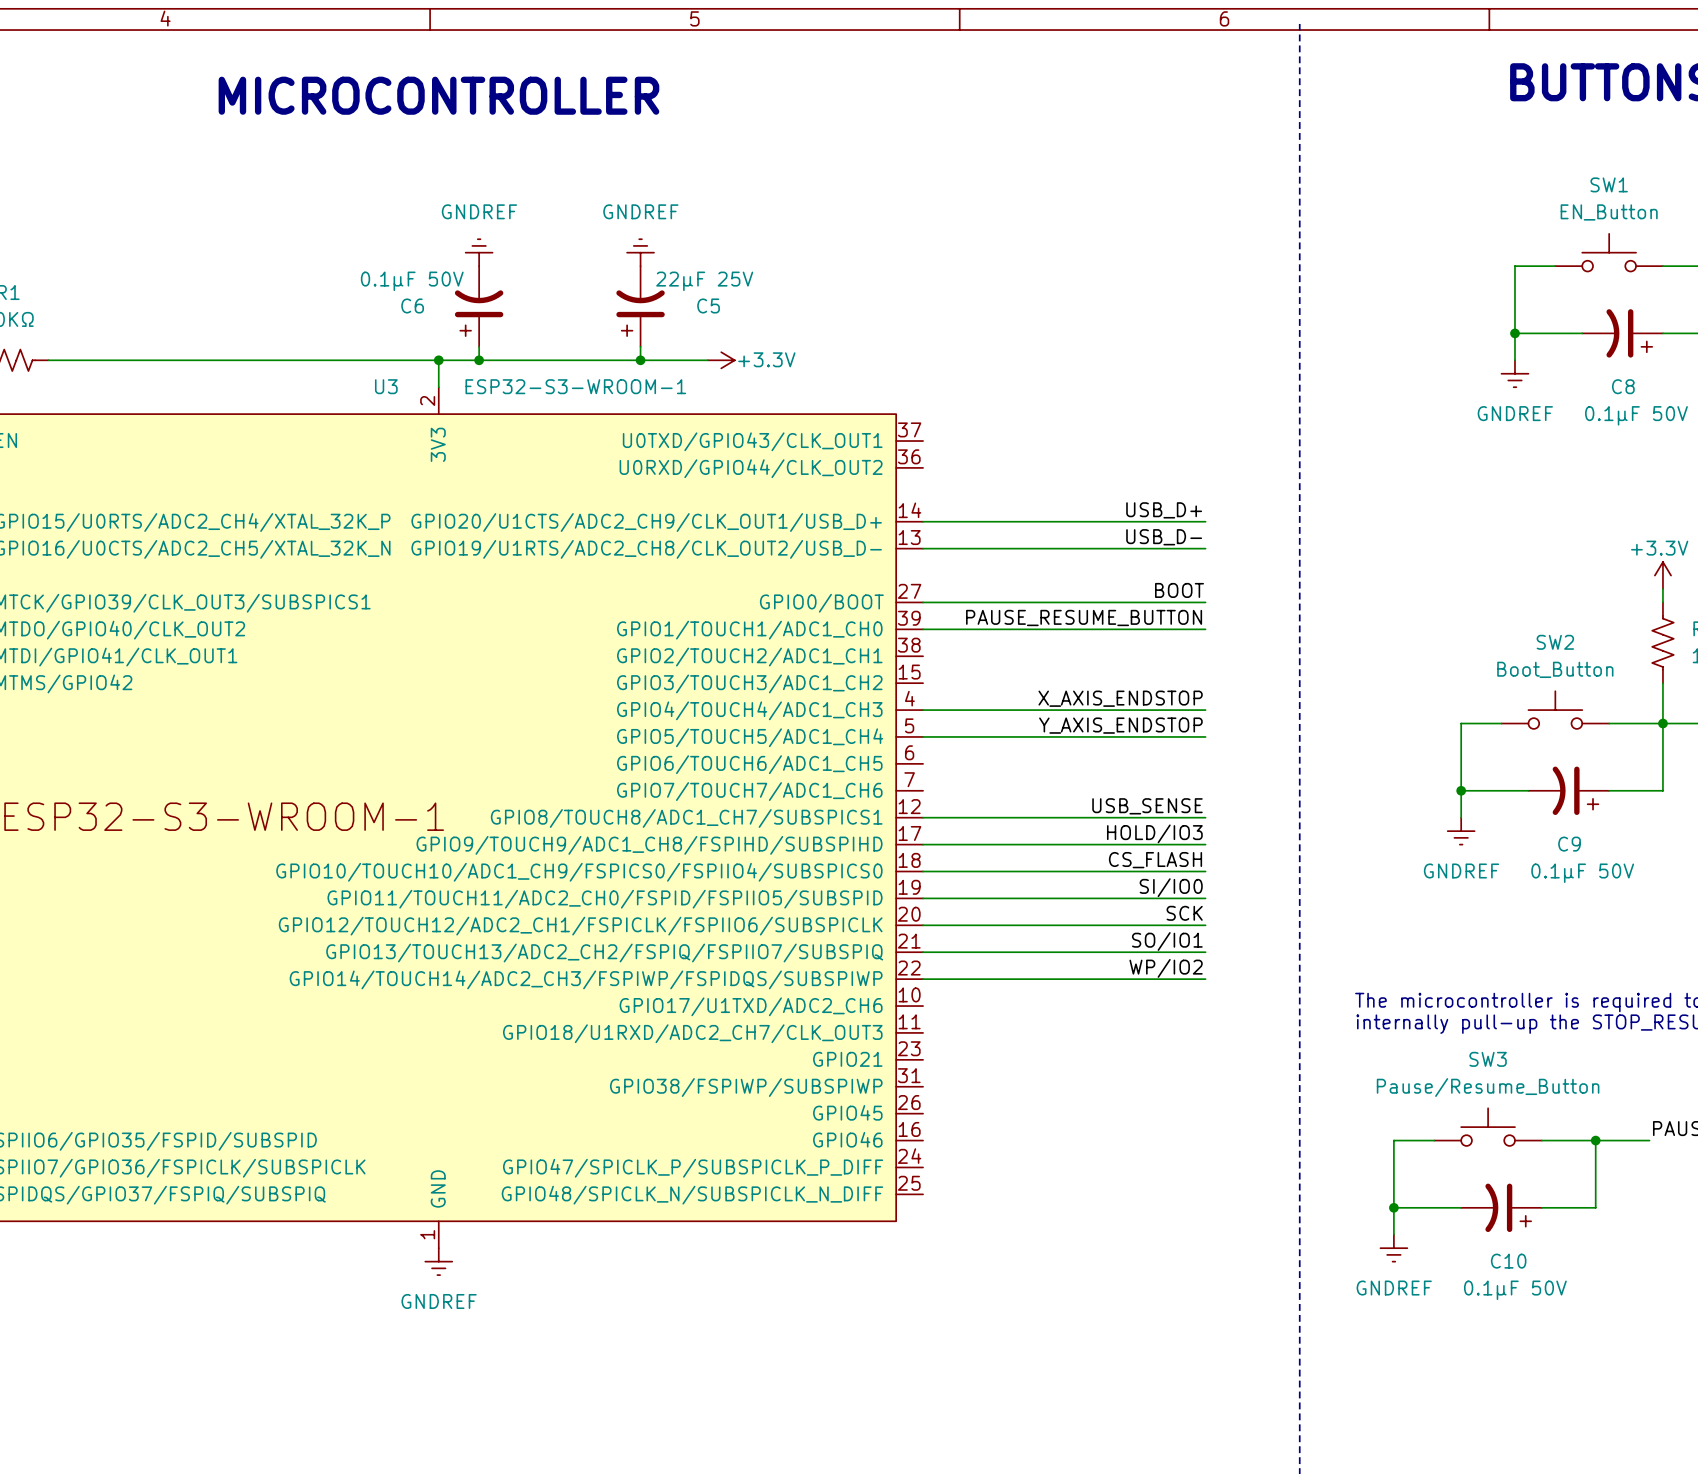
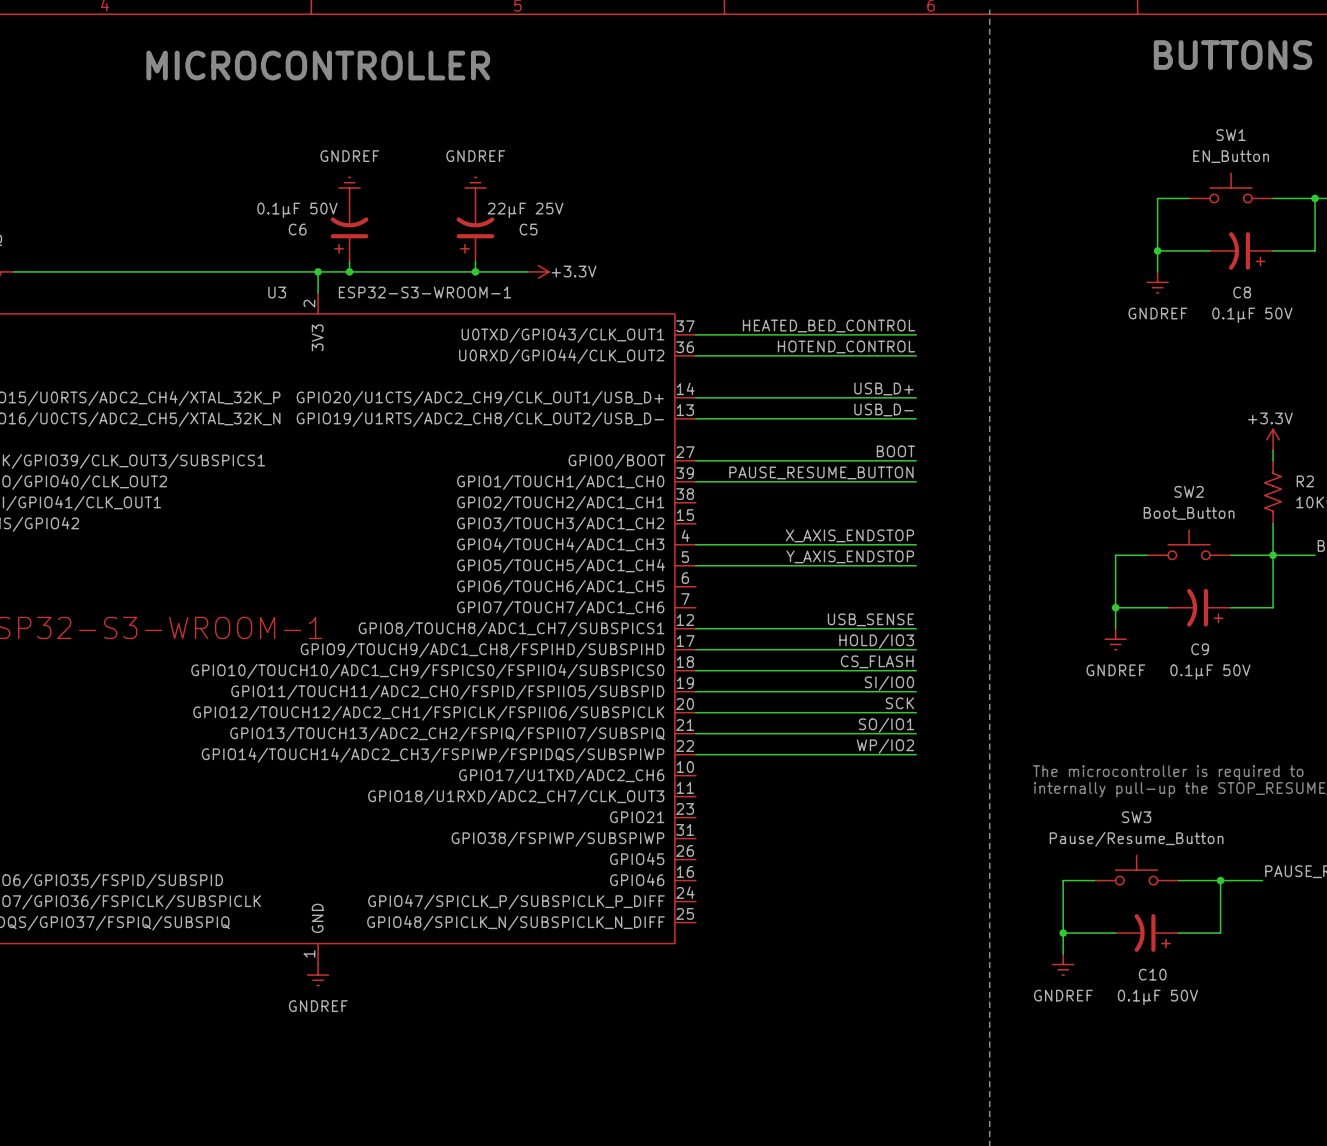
label: none -> HEATED_BED_CONTROL (828, 326)
wire: none -> (695, 334) (916, 334)
label: none -> HOTEND_CONTROL (846, 347)
wire: none -> (695, 355) (916, 355)

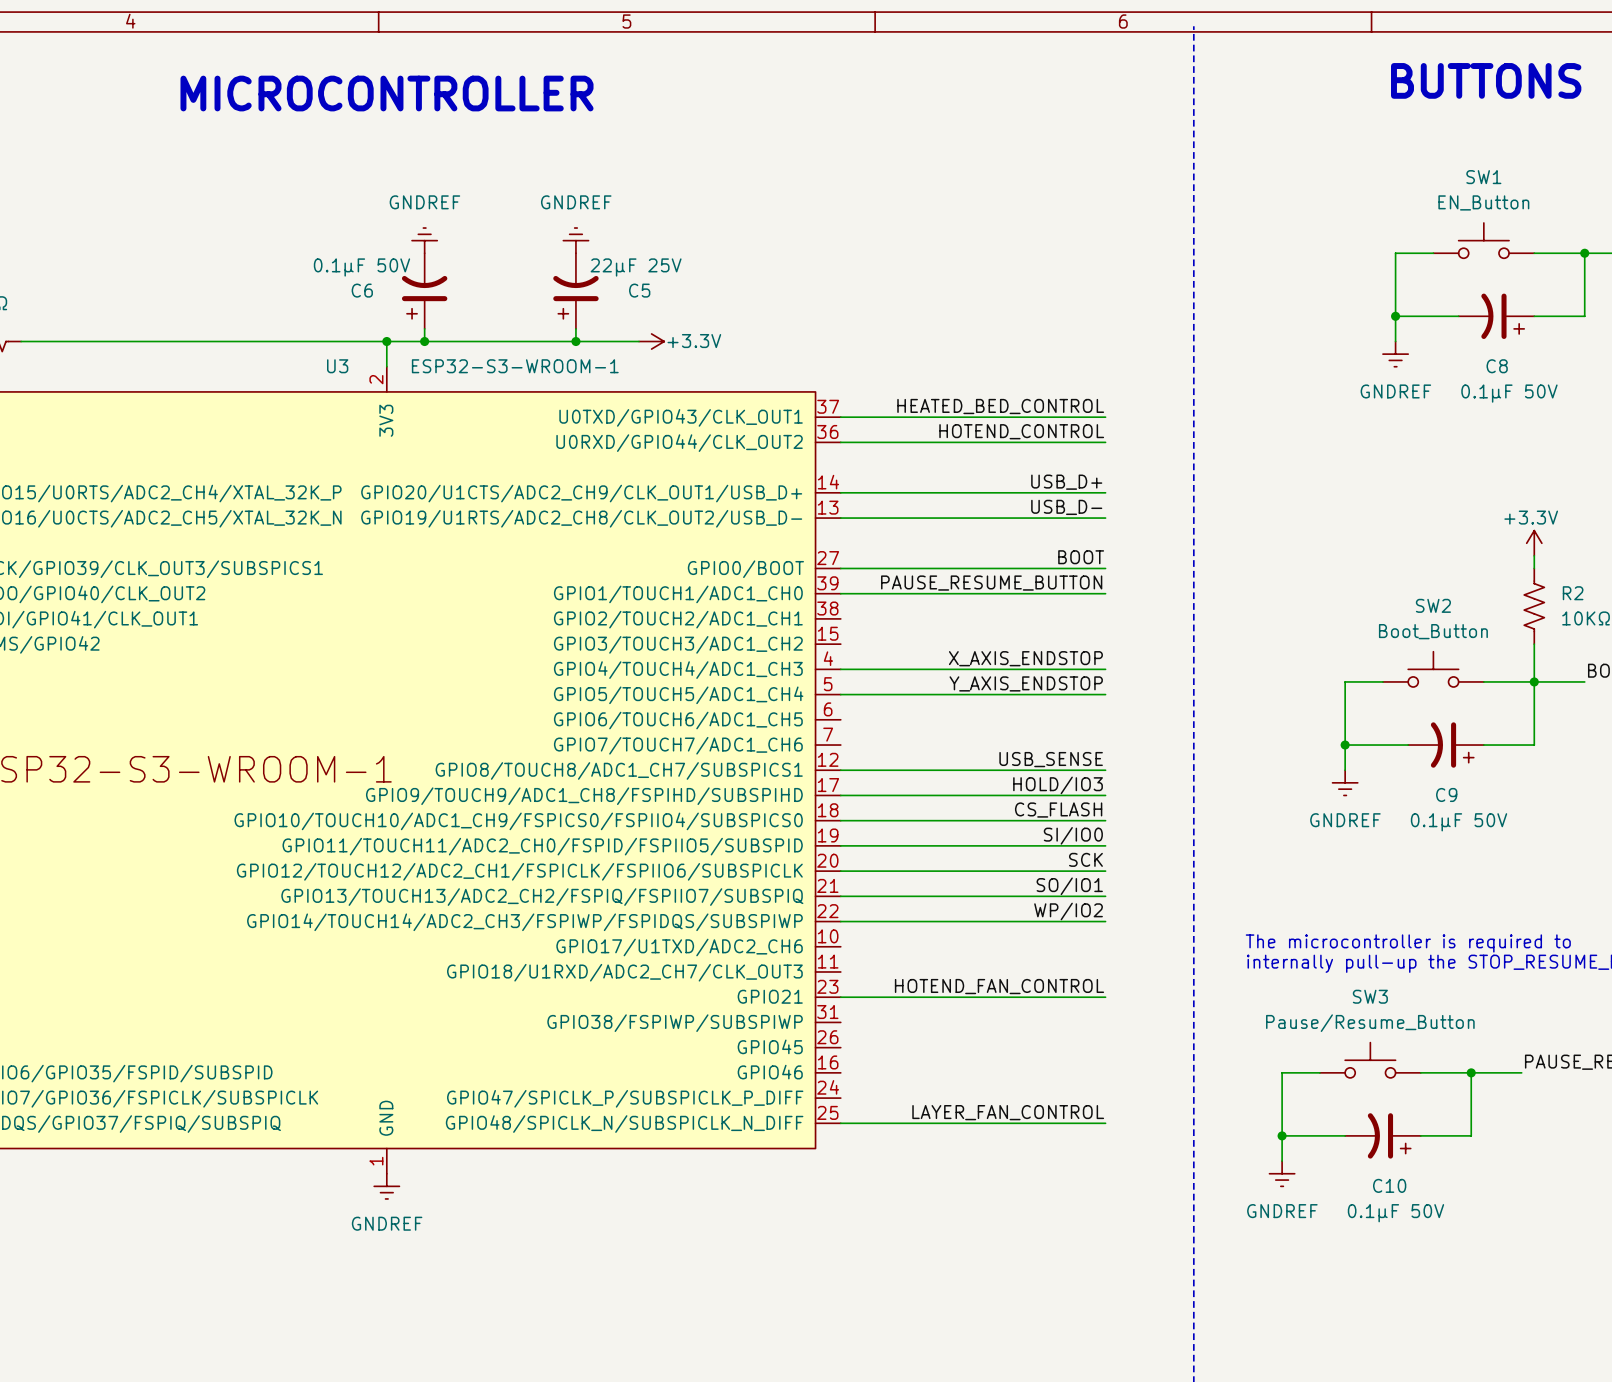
label: none -> HOTEND_FAN_CONTROL (999, 986)
wire: none -> (840, 997) (1105, 997)
label: none -> LAYER_FAN_CONTROL (1008, 1112)
wire: none -> (840, 1123) (1105, 1123)

